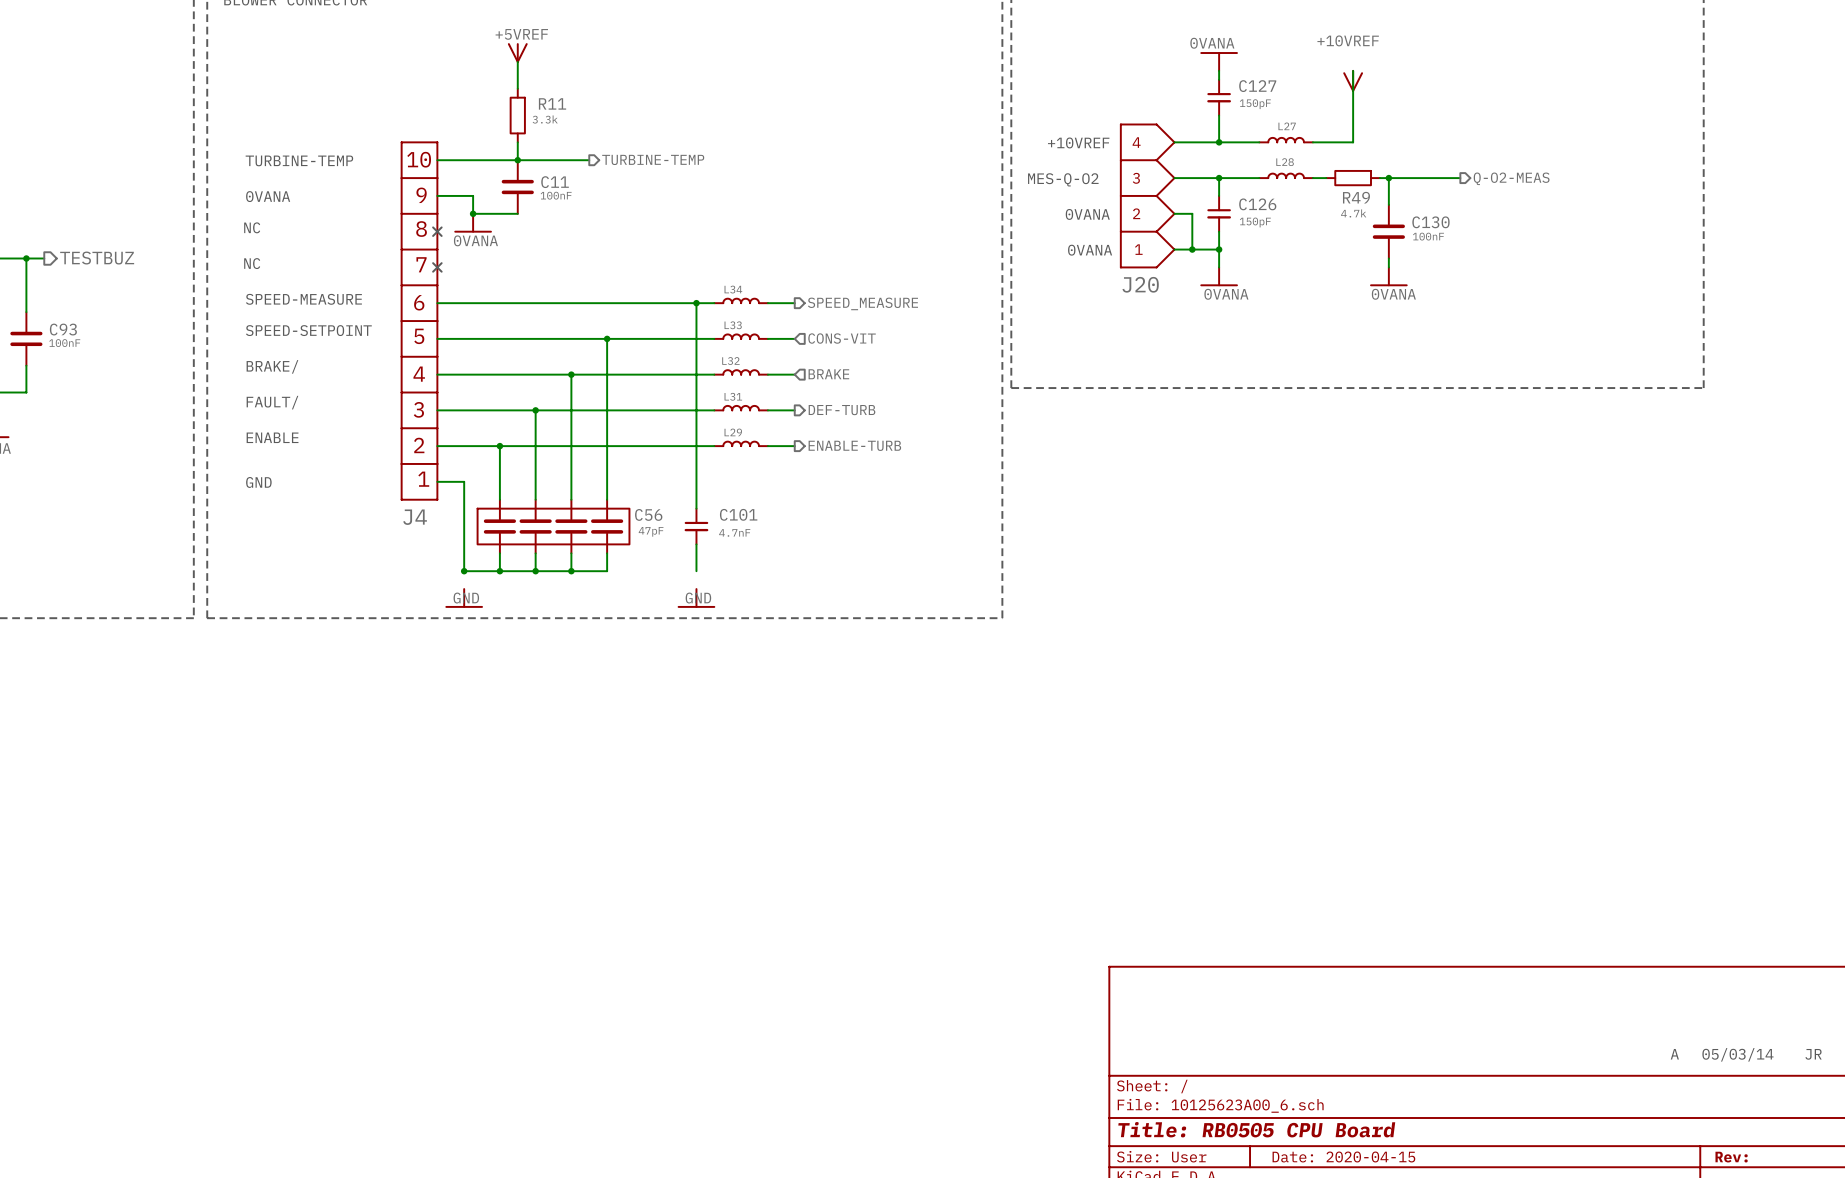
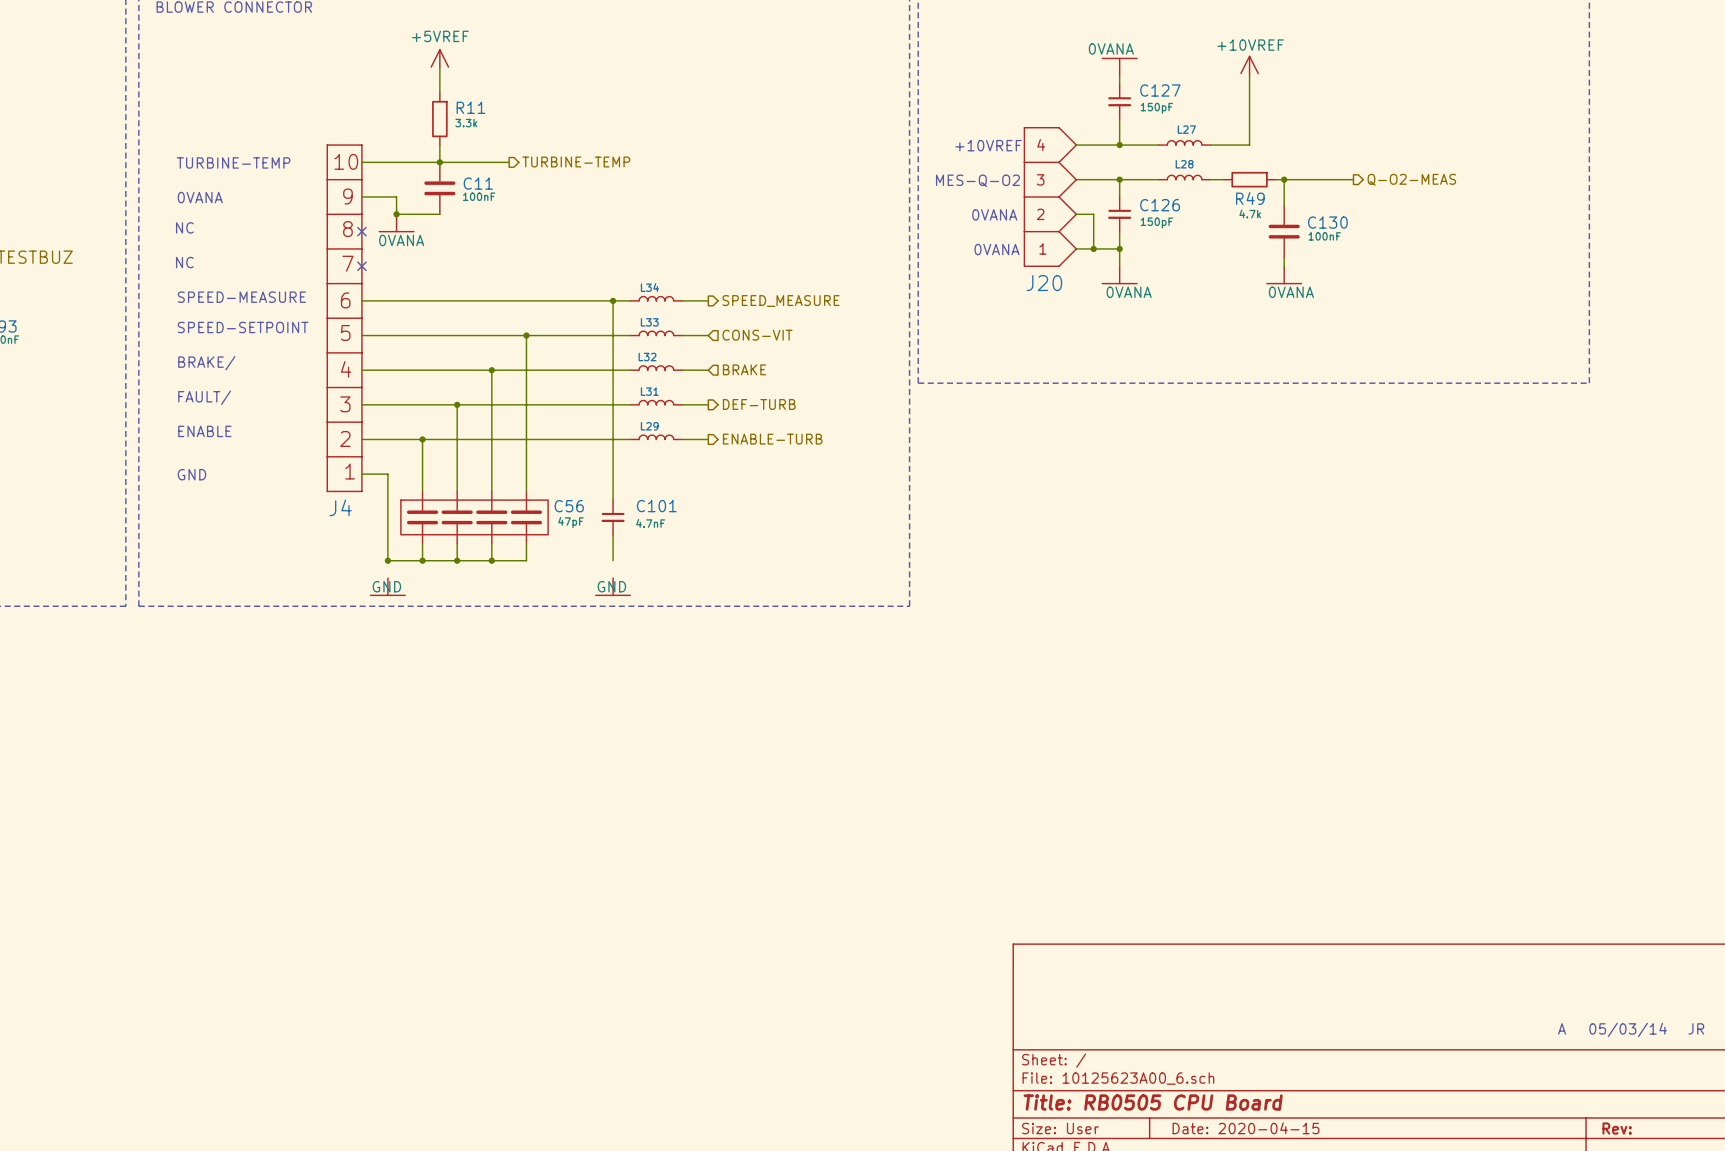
power symbol text position: +10VREF (1348, 40) -> +10VREF (1250, 45)
power symbol rotation: 0° (517, 53) -> 180° (439, 58)
power symbol position: +10VREF (1353, 80) -> +10VREF (1249, 66)
power symbol rotation: 0° (1353, 82) -> 180° (1249, 64)

